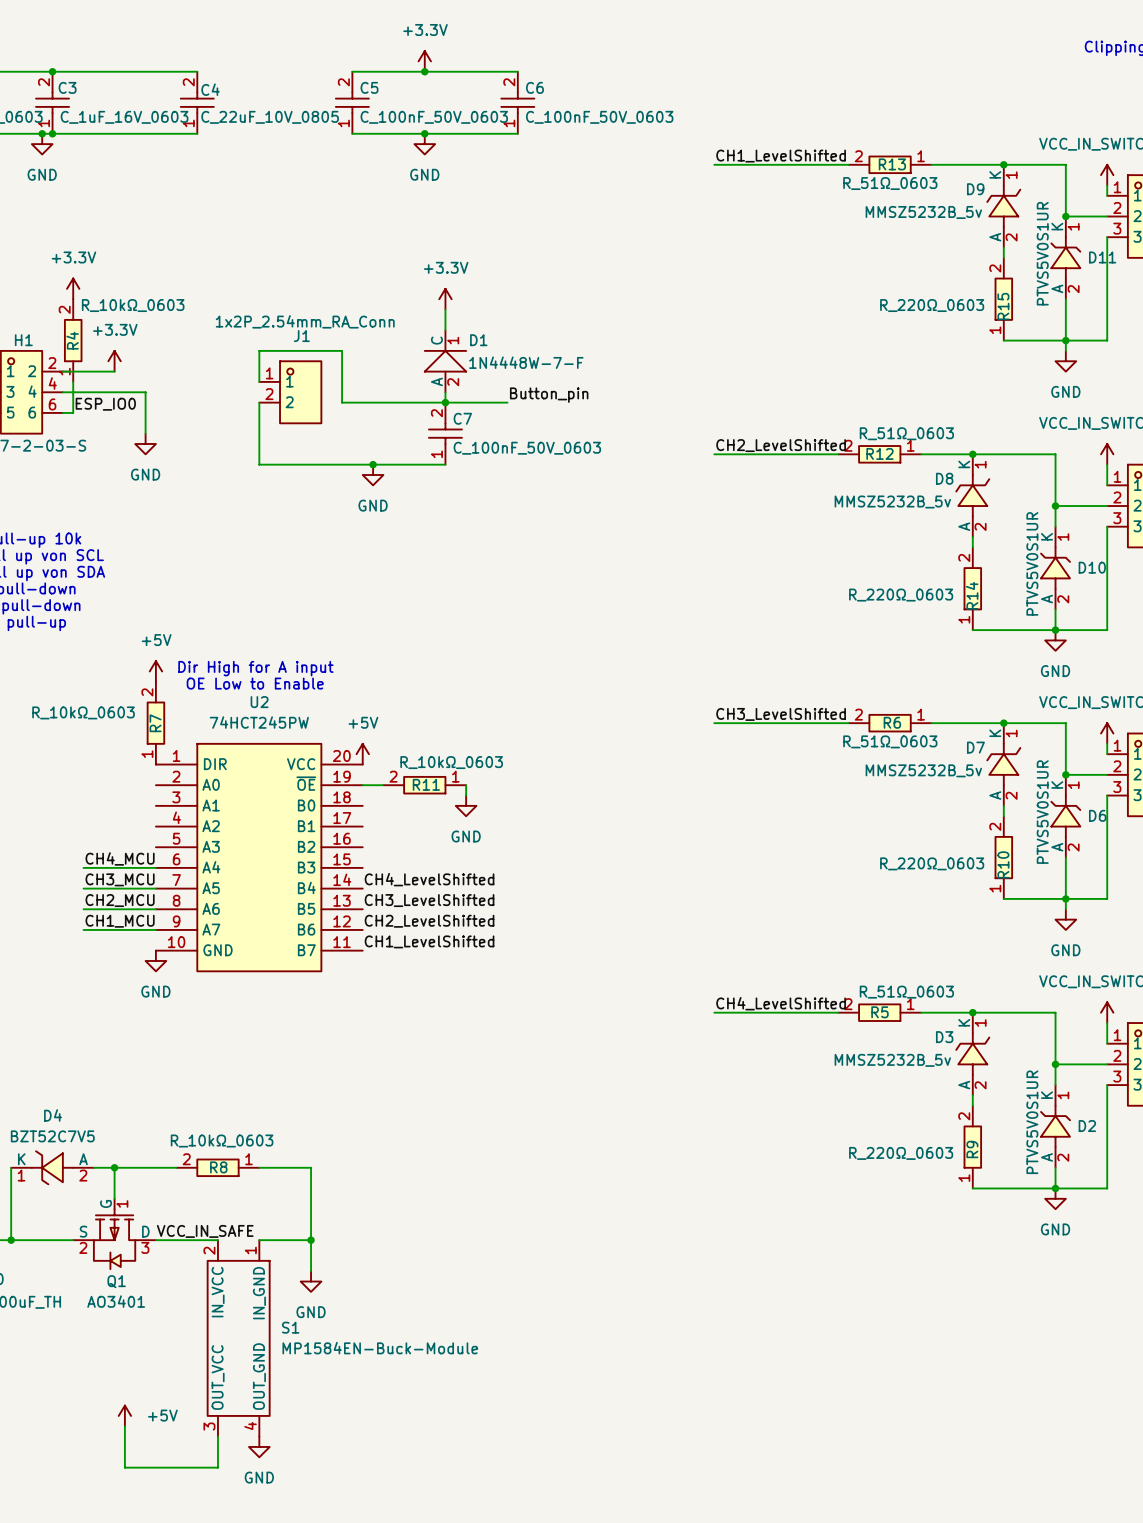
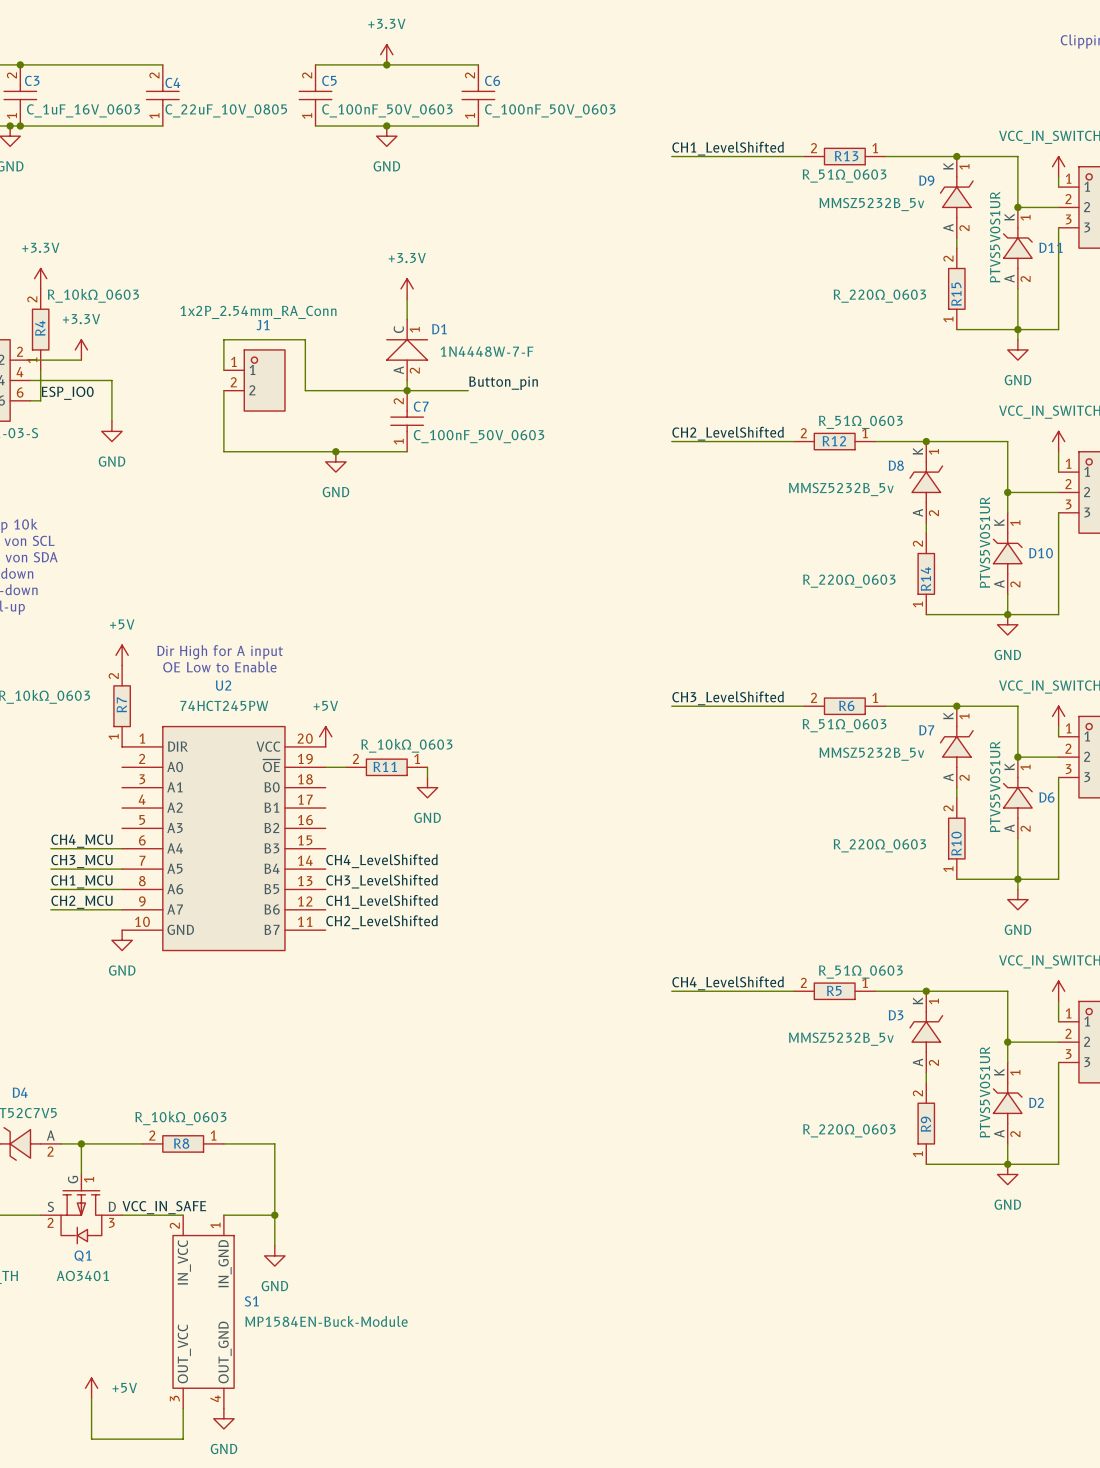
label: CH2_MCU (120, 900) -> CH1_MCU (82, 881)
label: CH1_MCU (120, 921) -> CH2_MCU (82, 902)
label: CH2_LevelShifted (429, 921) -> CH1_LevelShifted (381, 901)
label: CH1_LevelShifted (429, 941) -> CH2_LevelShifted (381, 922)

